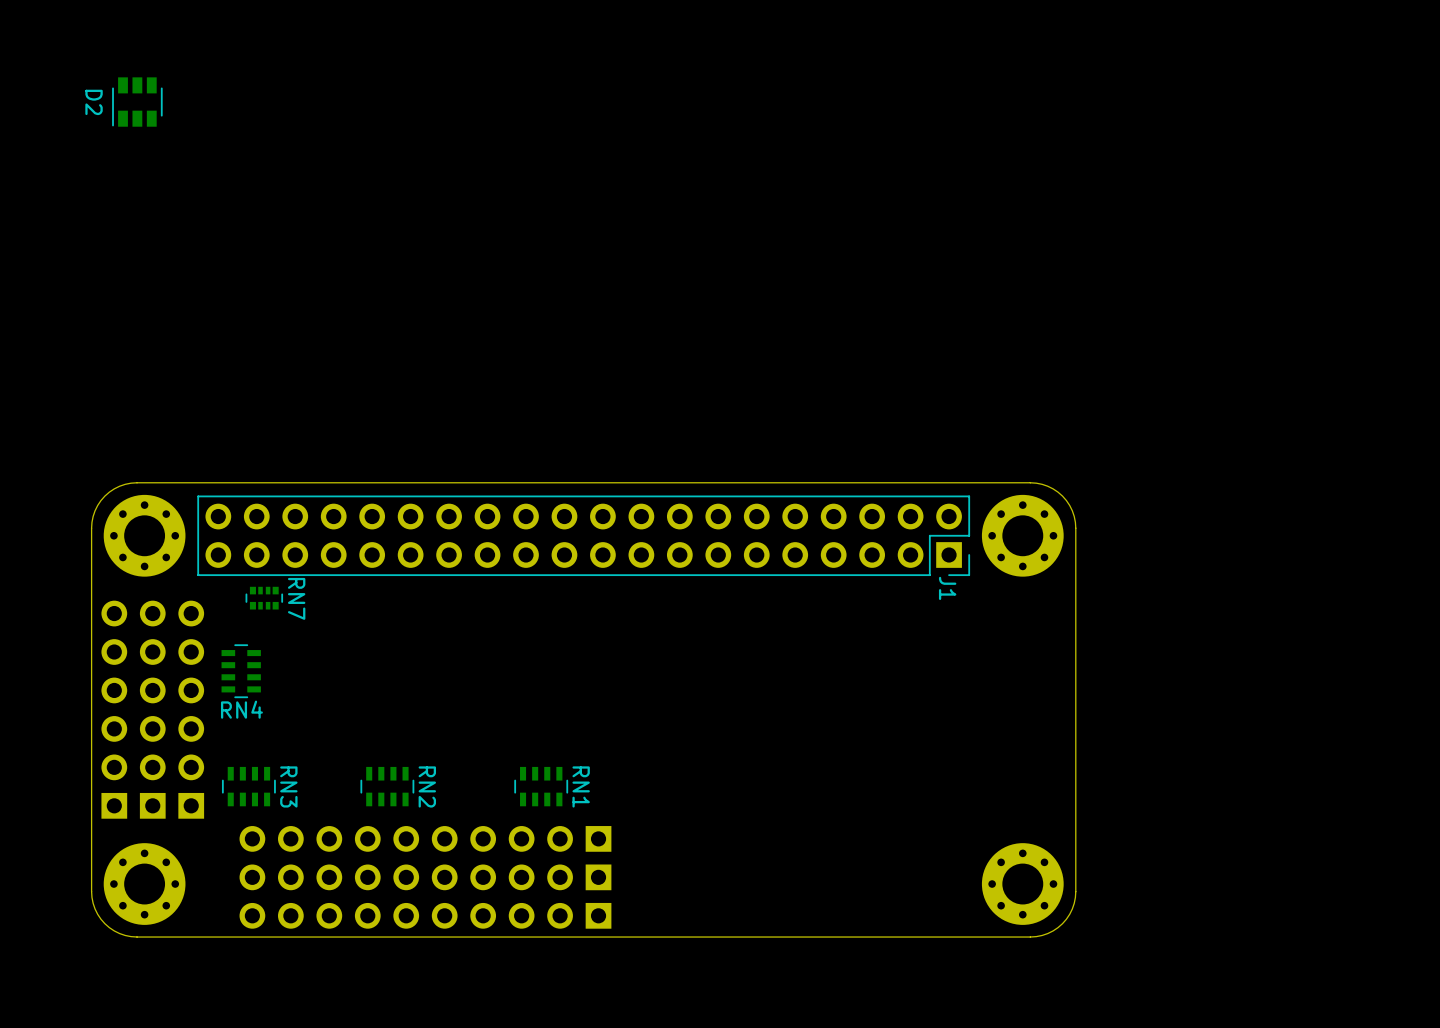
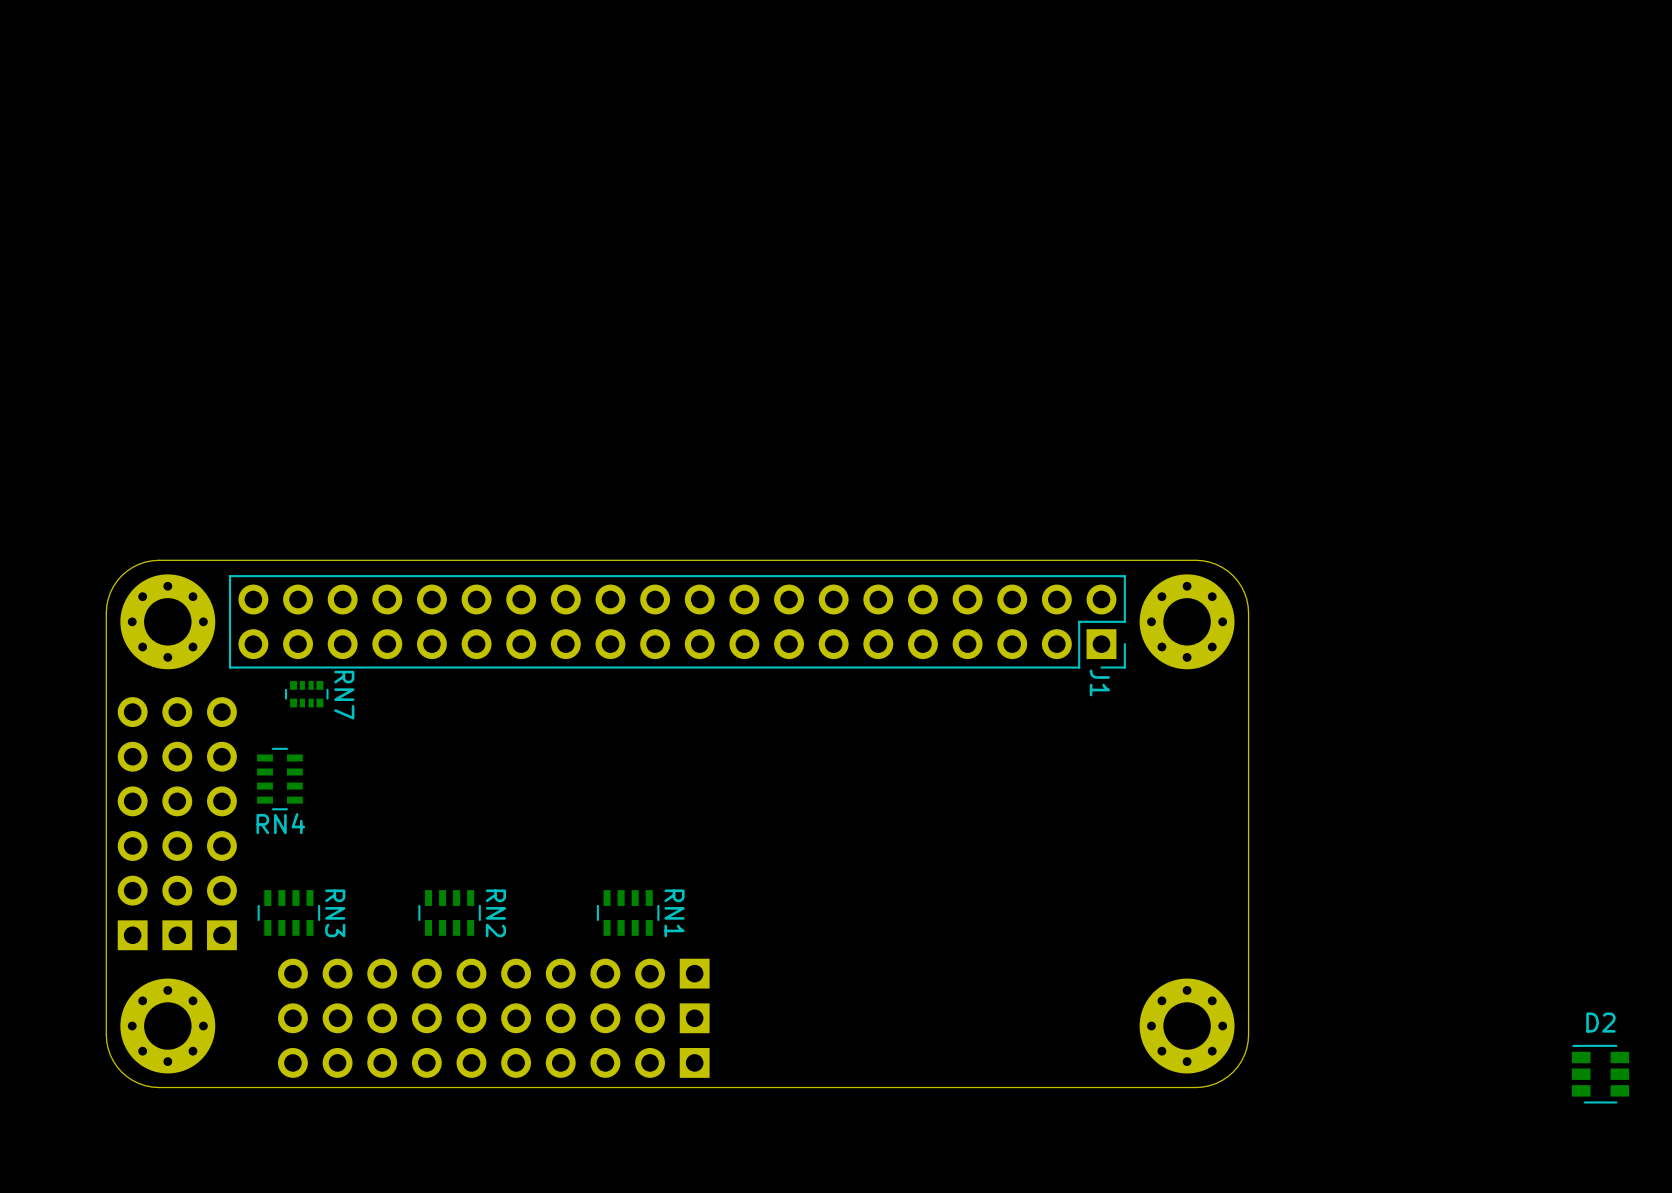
D2 rotation: 0° (137, 102) -> 90° clockwise (1600, 1074)
D2 position: (137, 102) -> (1600, 1074)

